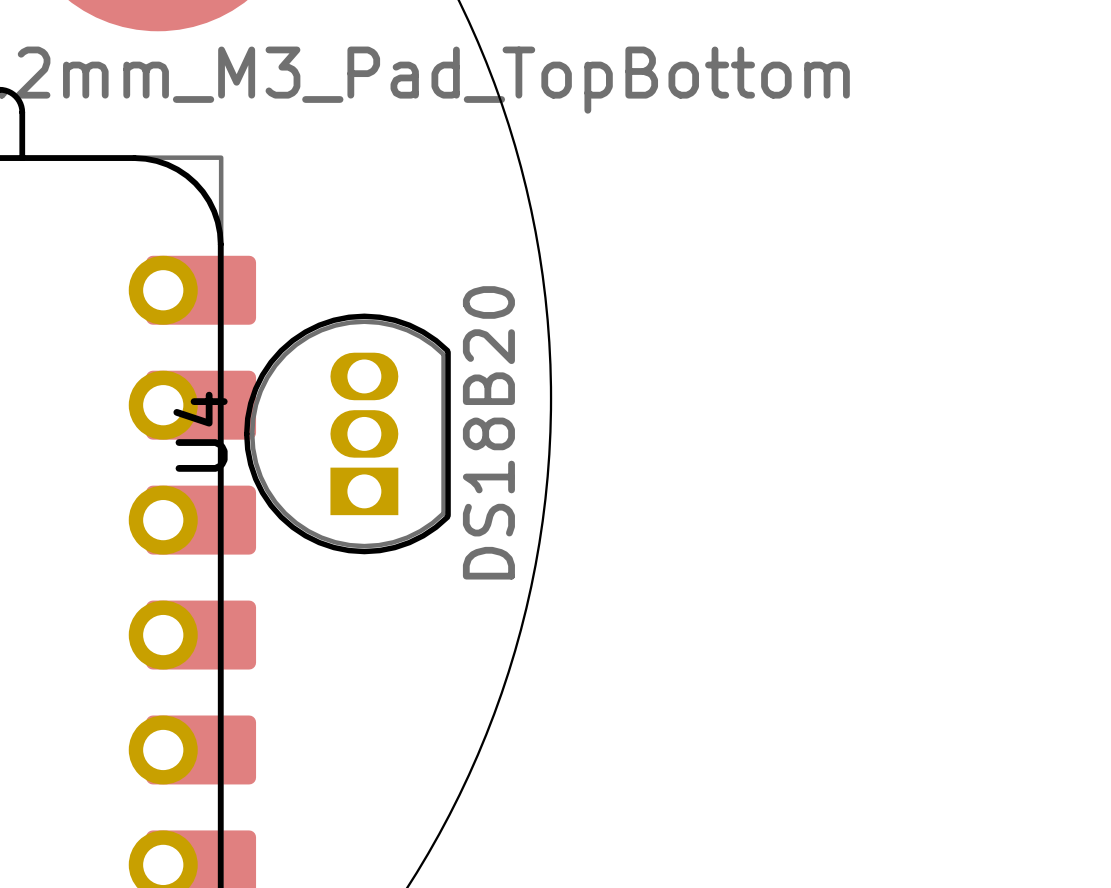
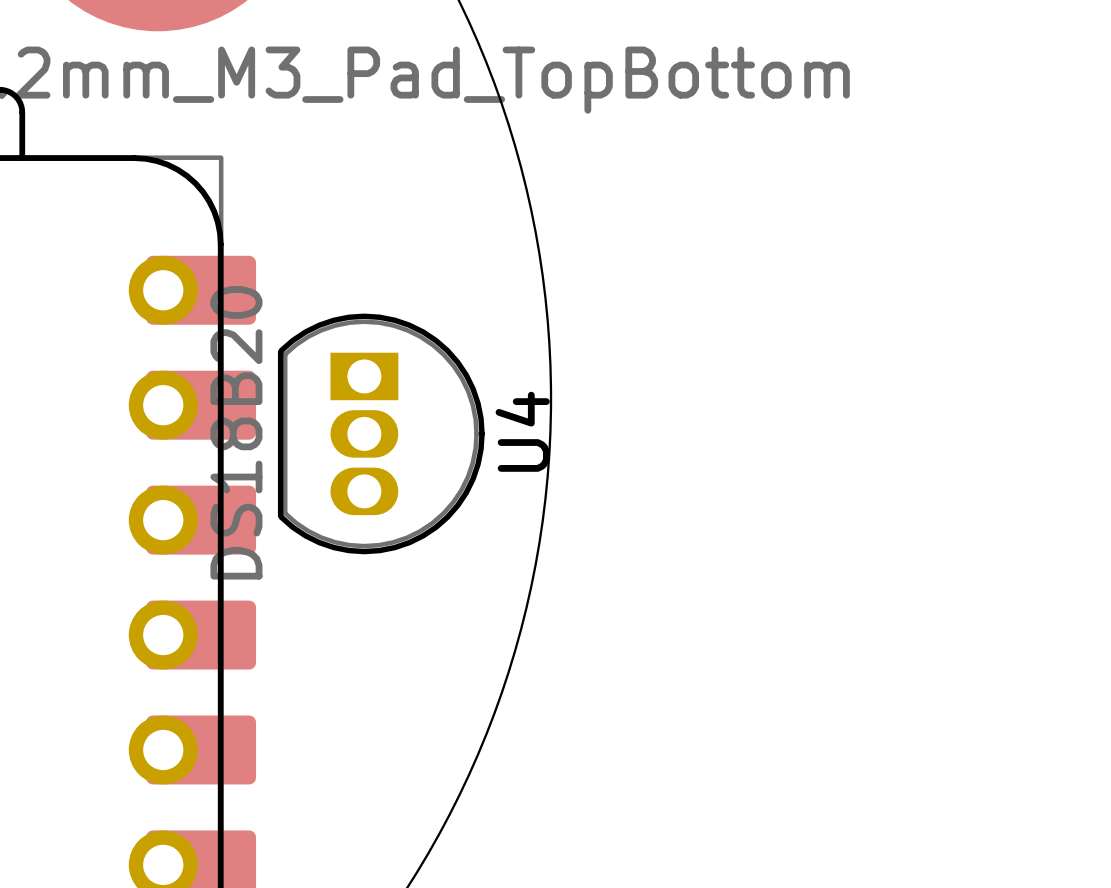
U4 rotation: 0° (347, 433) -> 180° (381, 433)

